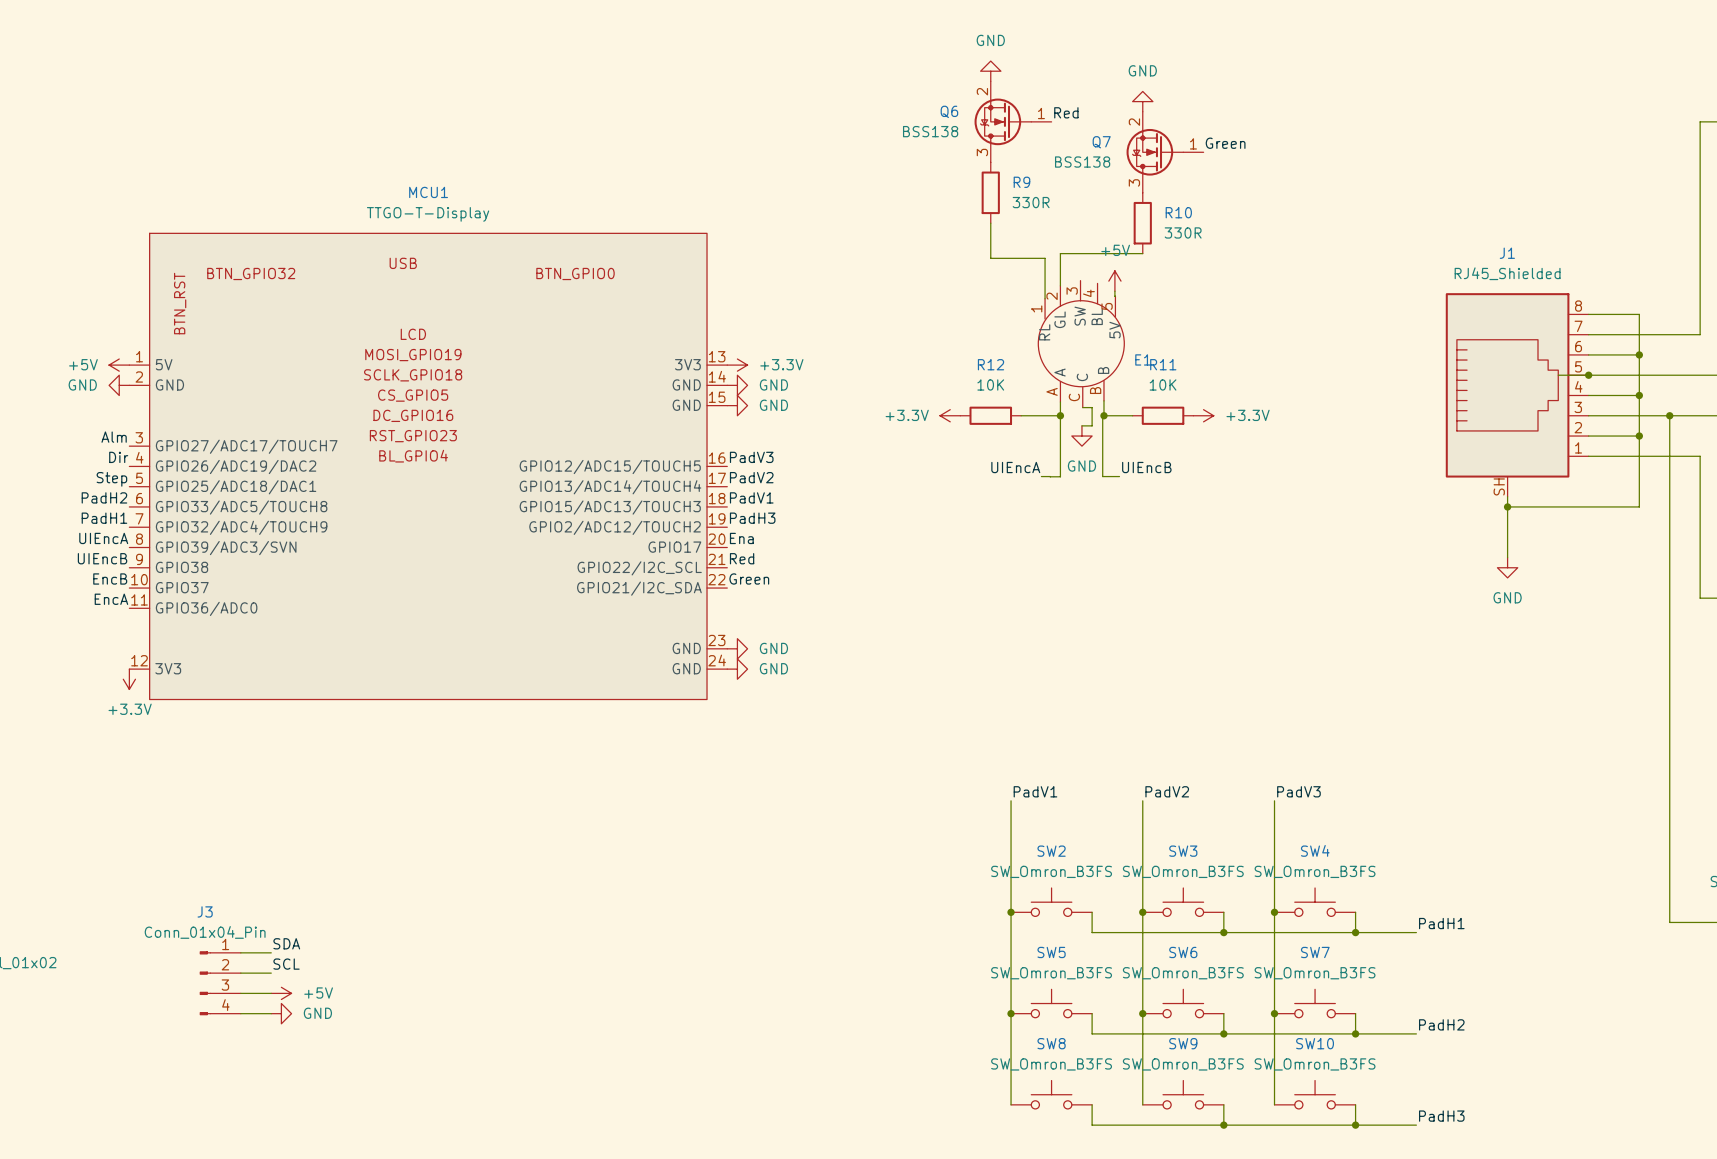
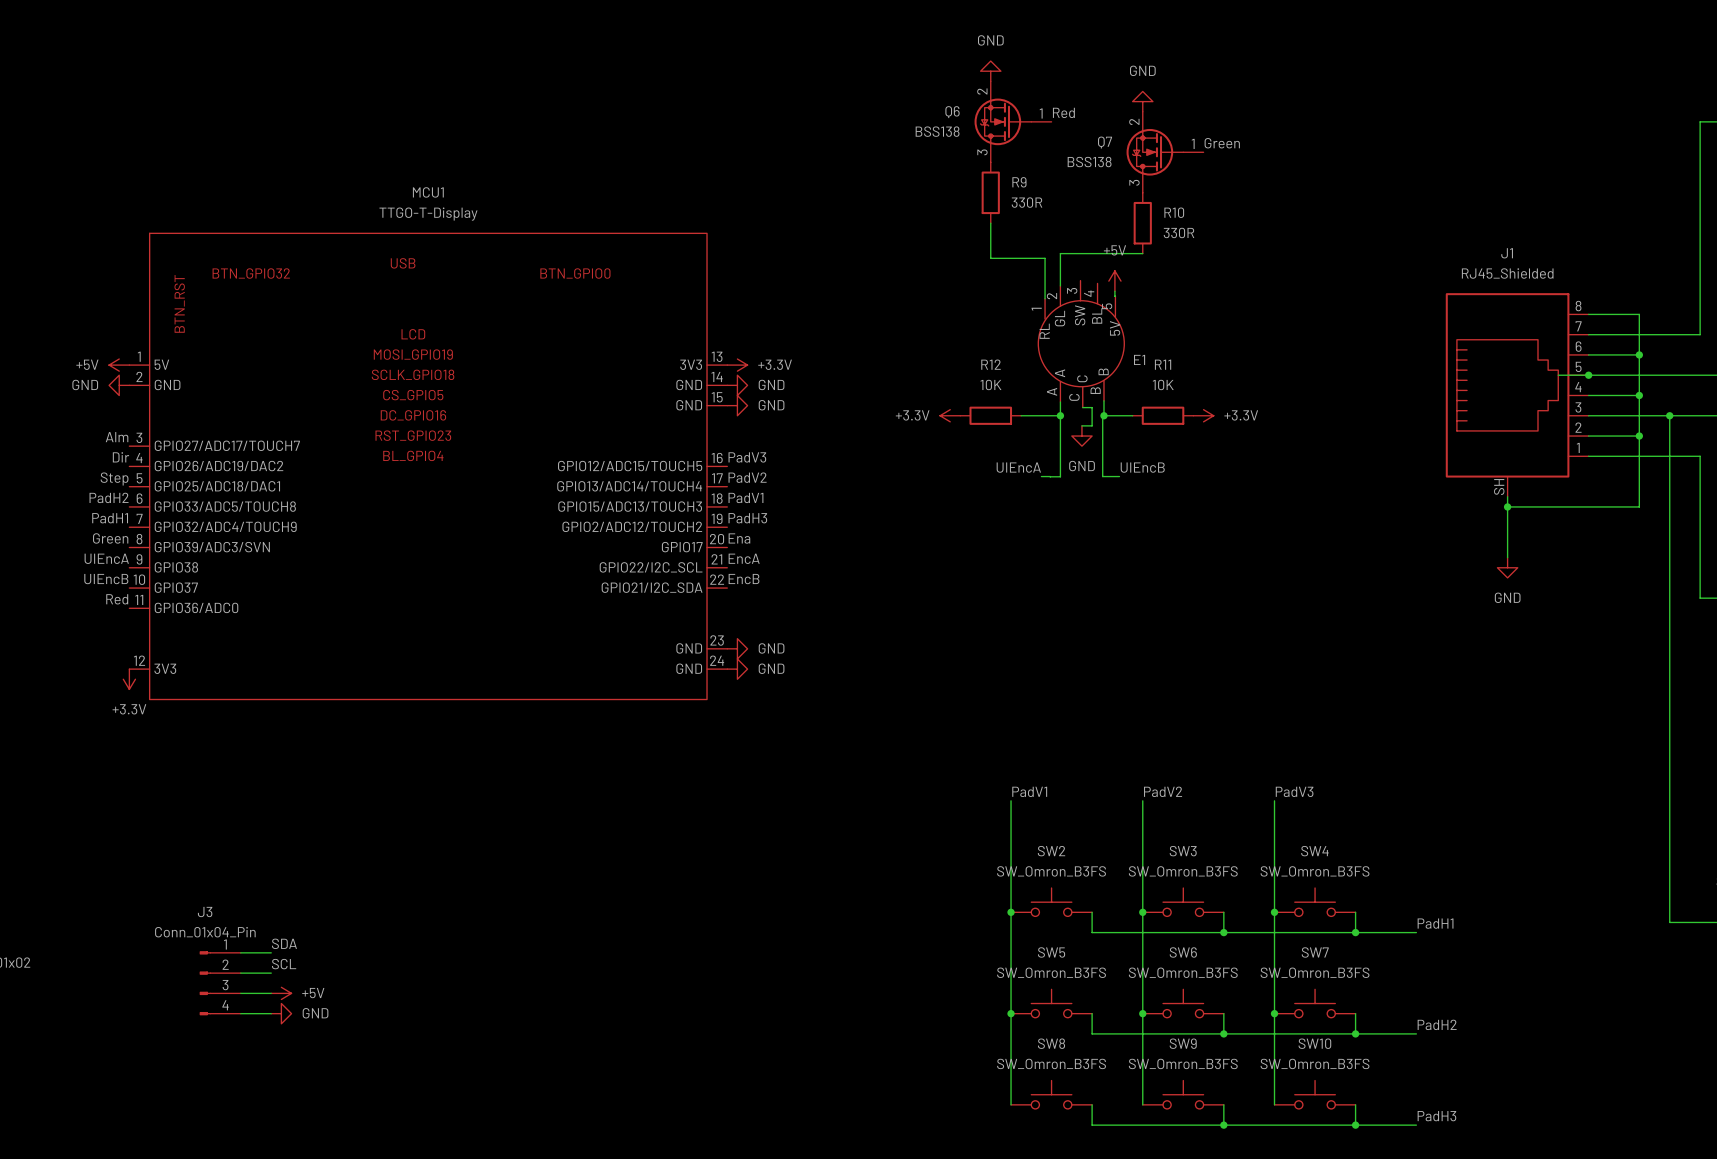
label: UIEncA (103, 538) -> Green (110, 538)
label: UIEncB (102, 558) -> UIEncA (106, 558)
label: Red (742, 558) -> EncA (744, 558)
label: EncB (110, 578) -> UIEncB (106, 579)
label: Green (749, 578) -> EncB (744, 579)
label: EncA (111, 599) -> Red (117, 599)

